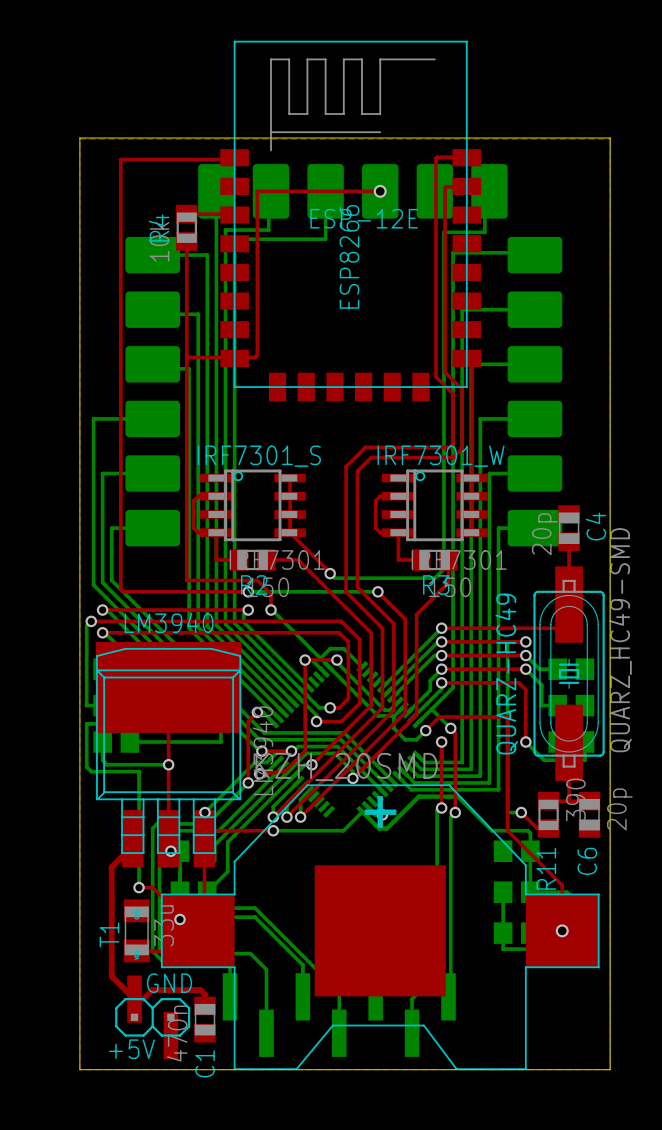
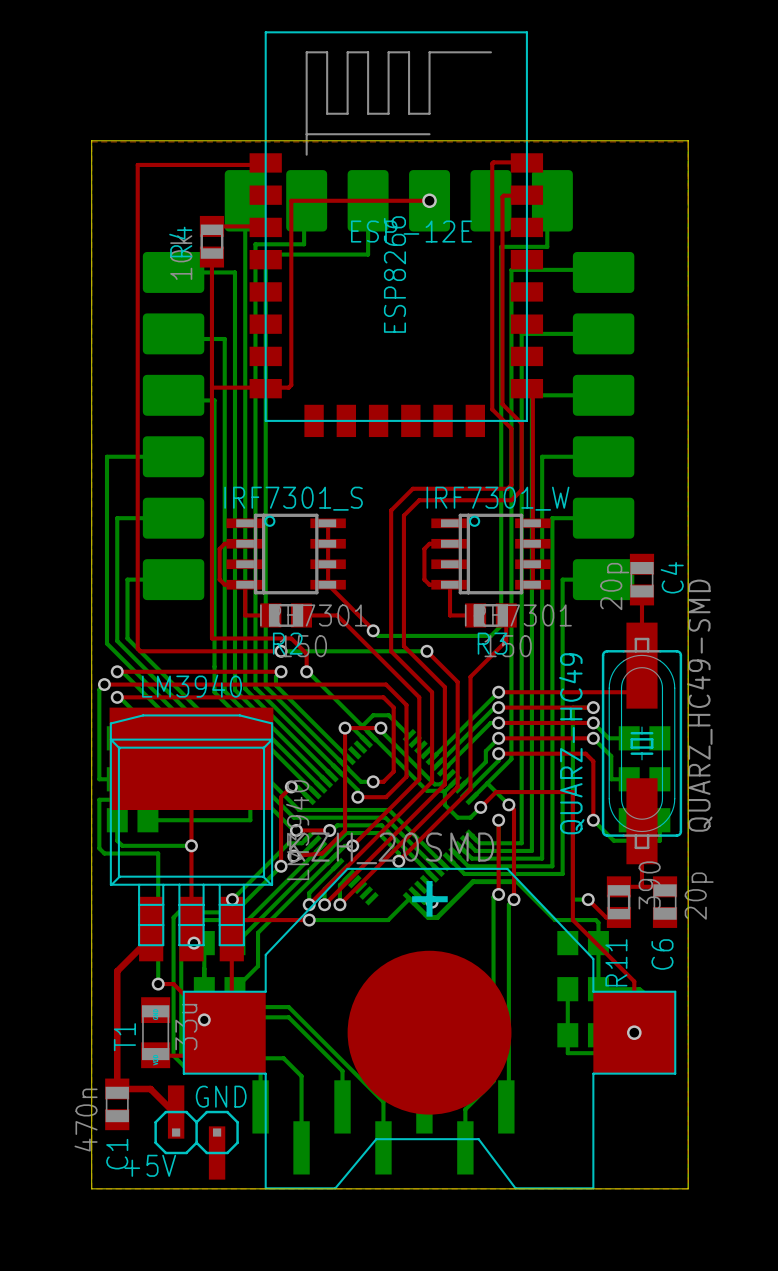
part footprint: [160, 784, 600, 1071] -> [182, 867, 677, 1190]
top track: (111, 867) (111, 976) (134, 999) -> (127, 961) (117, 971) (117, 1089) (150, 1089) (173, 1112) (176, 1112)
text position: GND (169, 983) -> GND (221, 1096)
top track: (134, 999) (143, 999) (152, 990) (200, 990) (205, 994) (205, 1005) -> none
part position: (152, 1017) -> (196, 1132)
C1 position: (205, 1019) -> (117, 1104)

